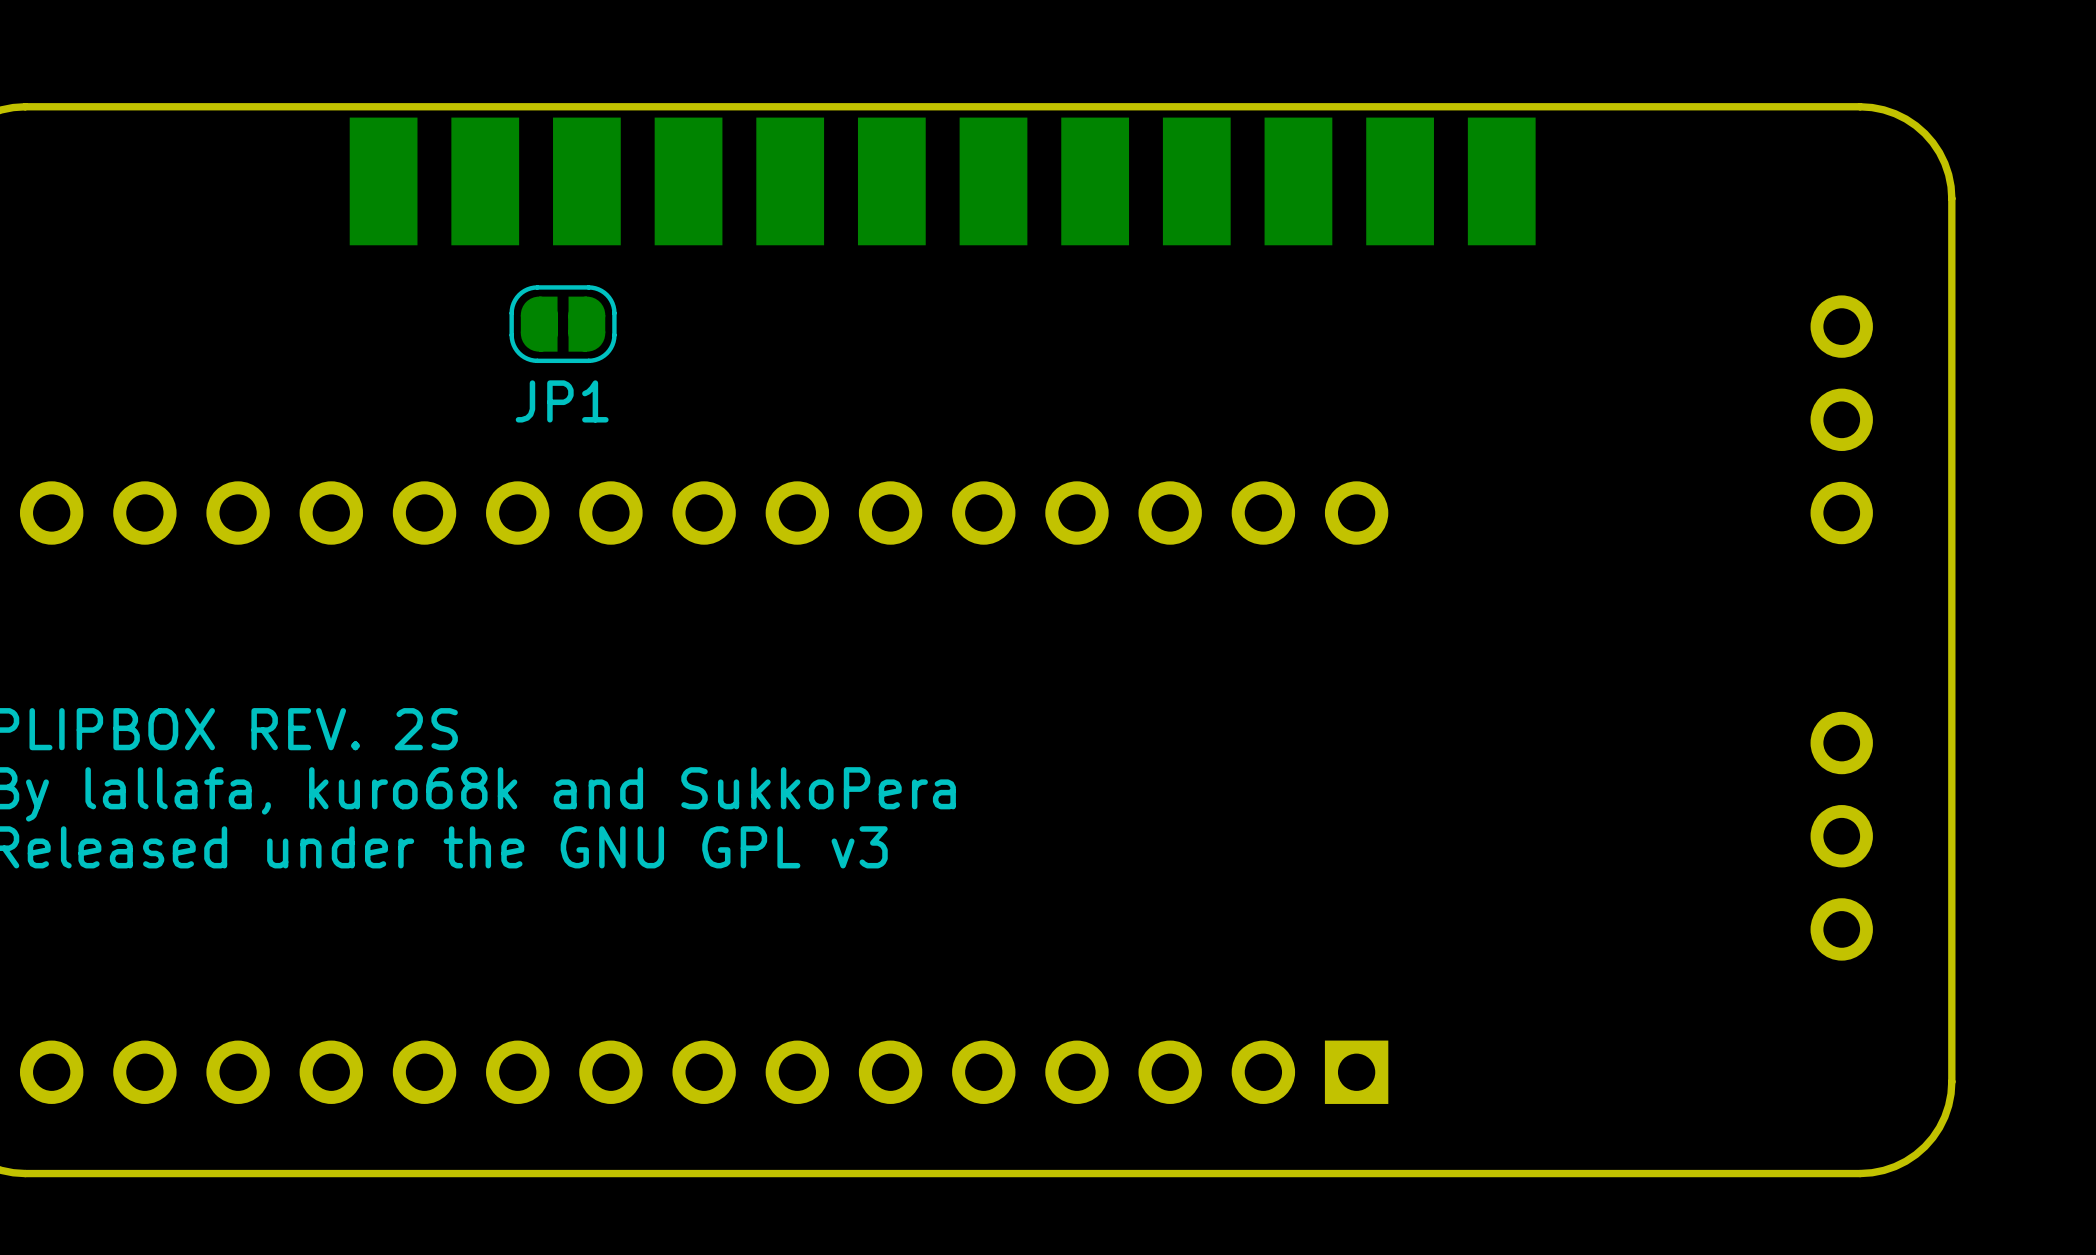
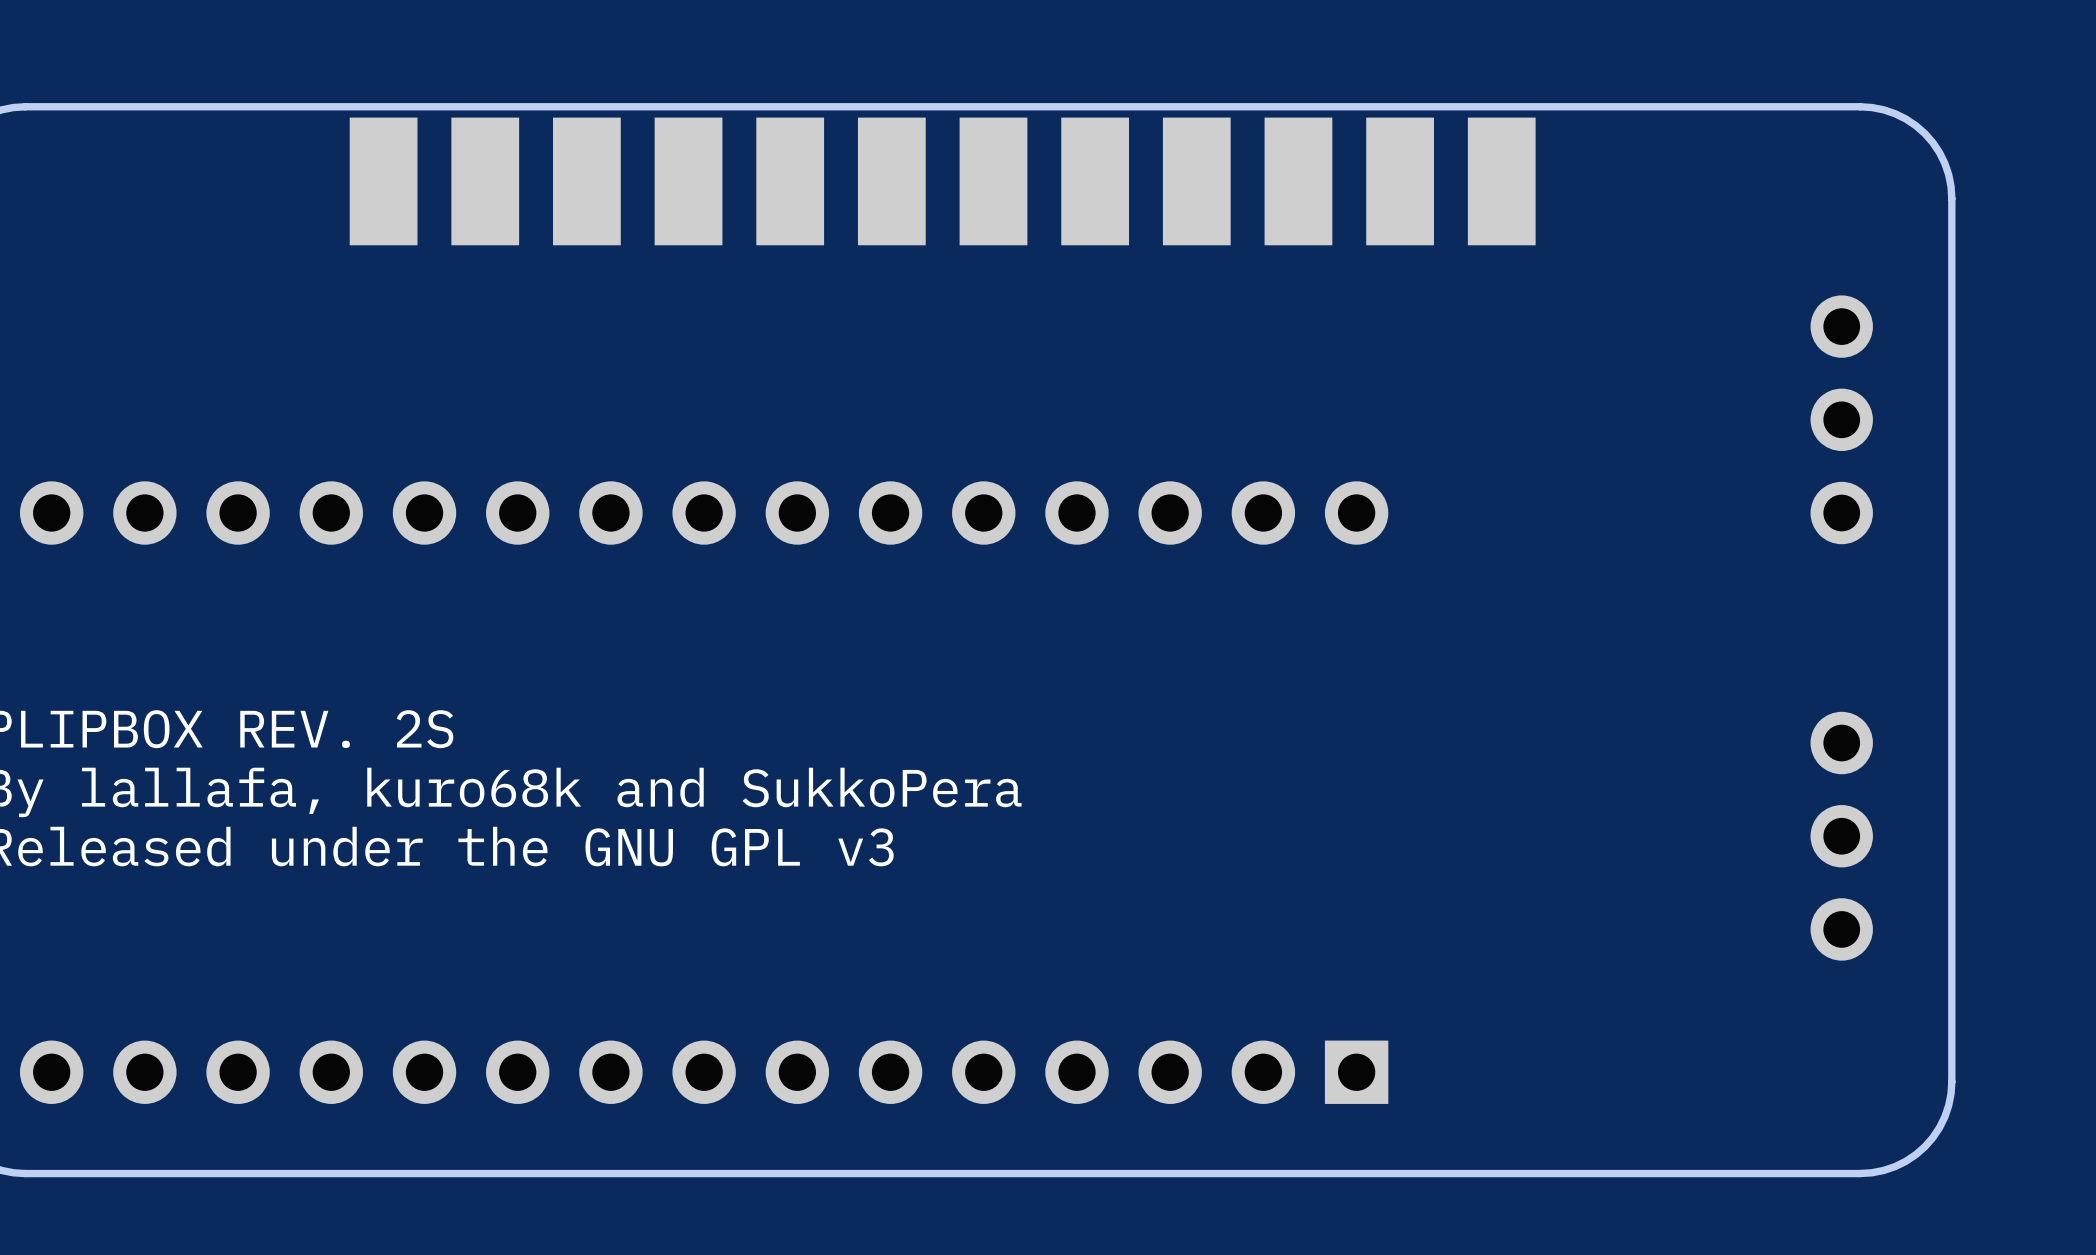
JP1: (563, 324) -> none

